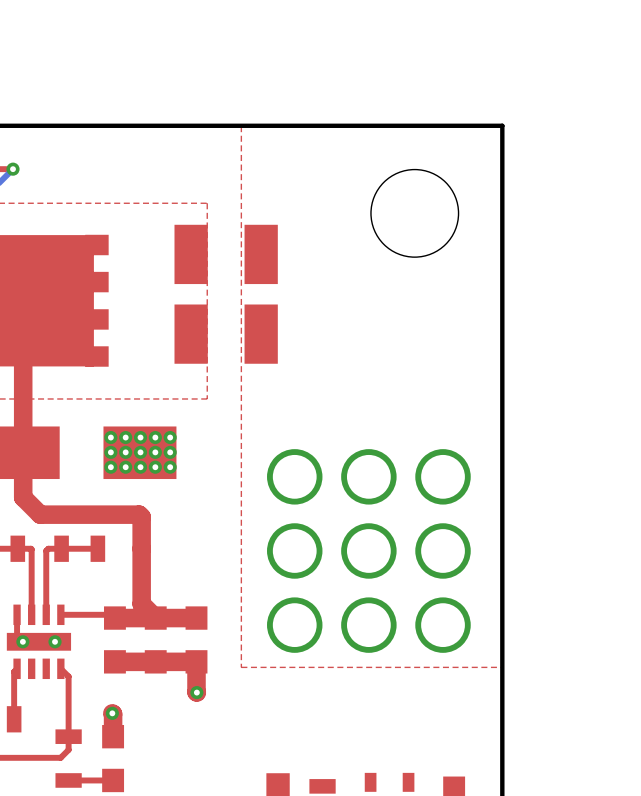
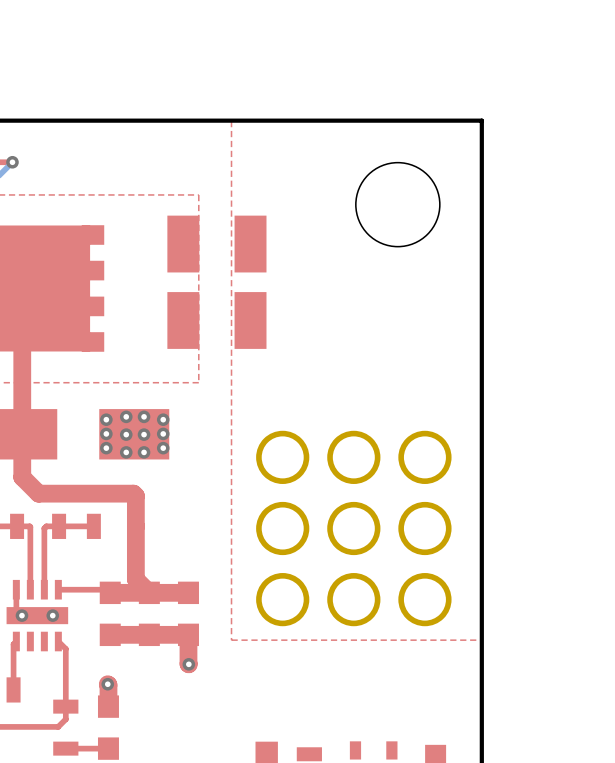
via: none -> (126, 416)
via: none -> (144, 416)
via: (125, 437) -> none
via: (140, 437) -> none
via: (155, 437) -> none
via: (125, 452) -> none
via: (140, 452) -> none
via: (155, 452) -> none
via: none -> (126, 434)
via: none -> (144, 434)
via: (125, 467) -> none
via: (140, 467) -> none
via: (155, 467) -> none
via: none -> (126, 452)
via: none -> (144, 452)

